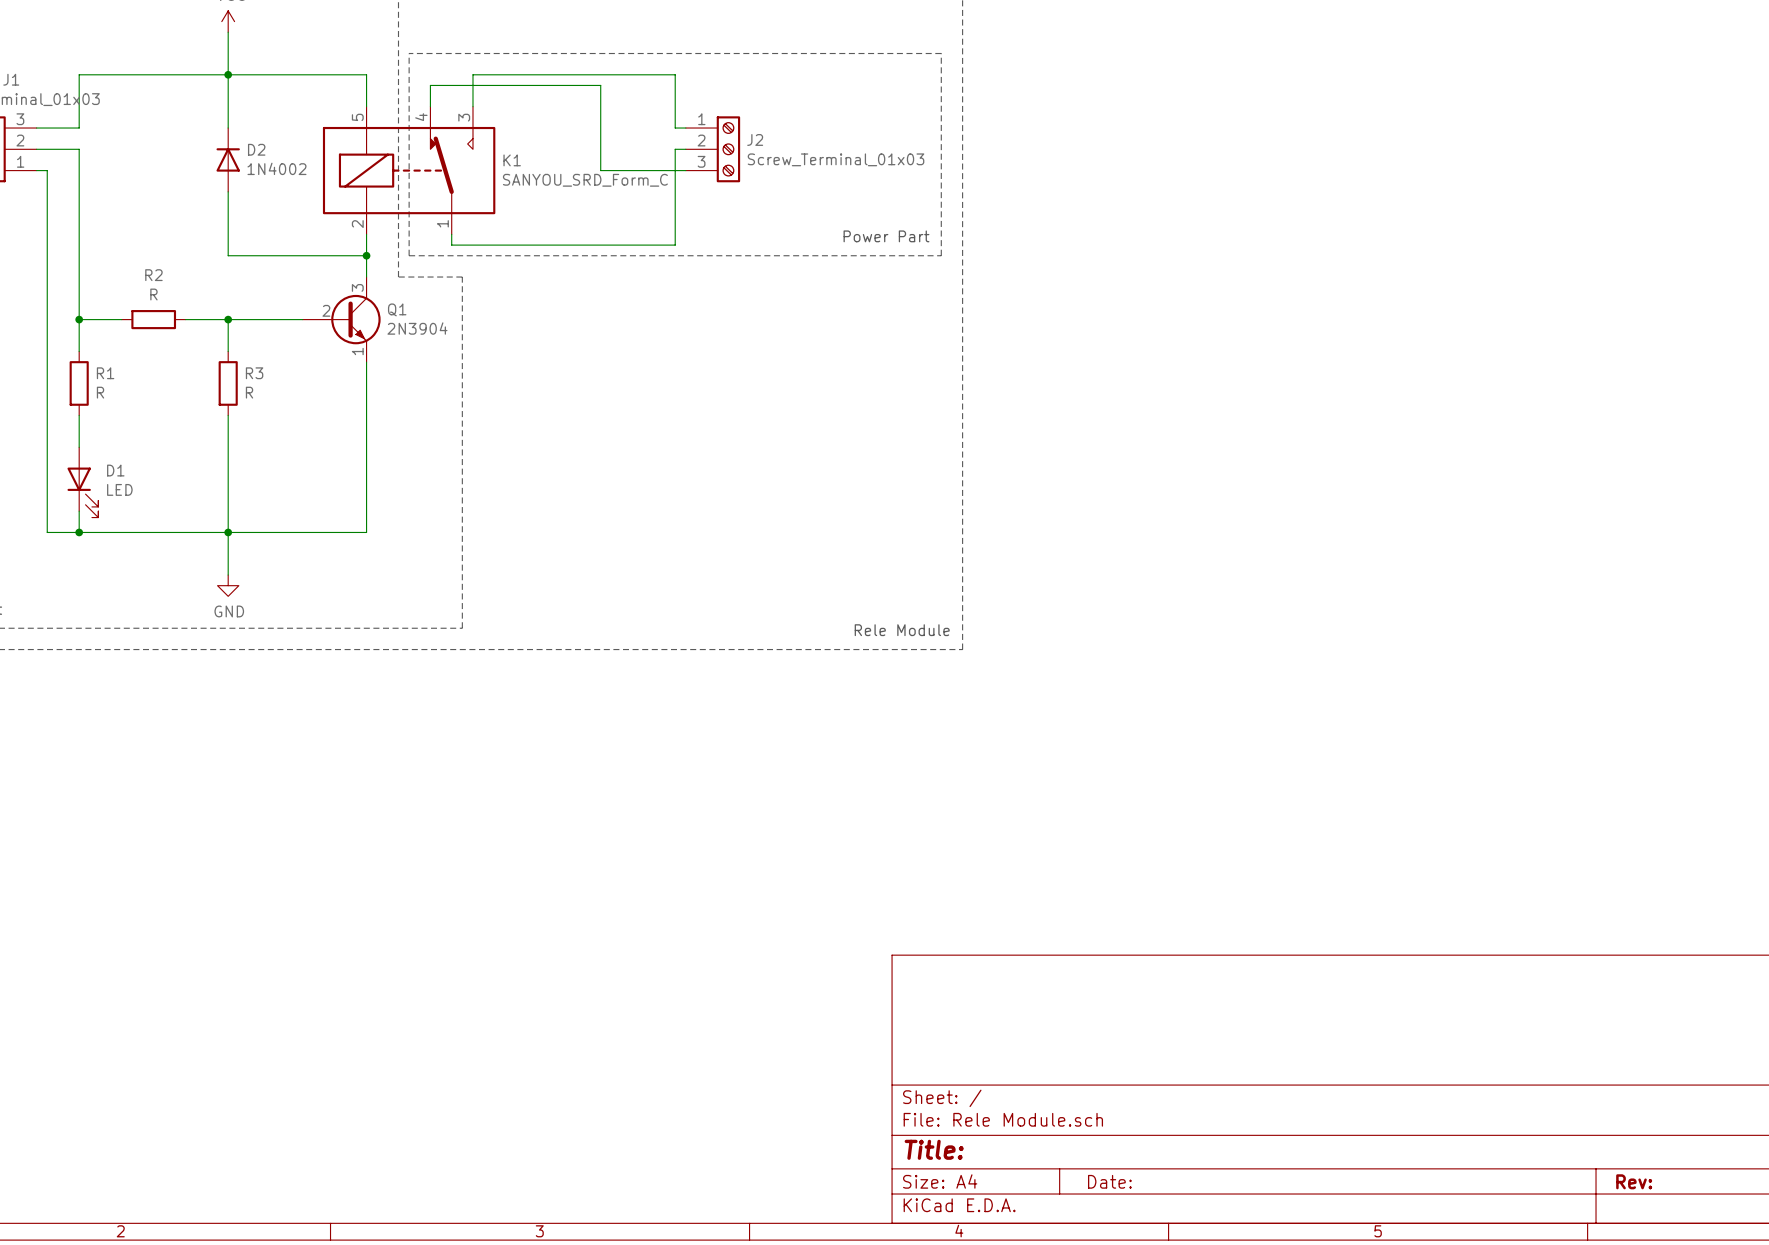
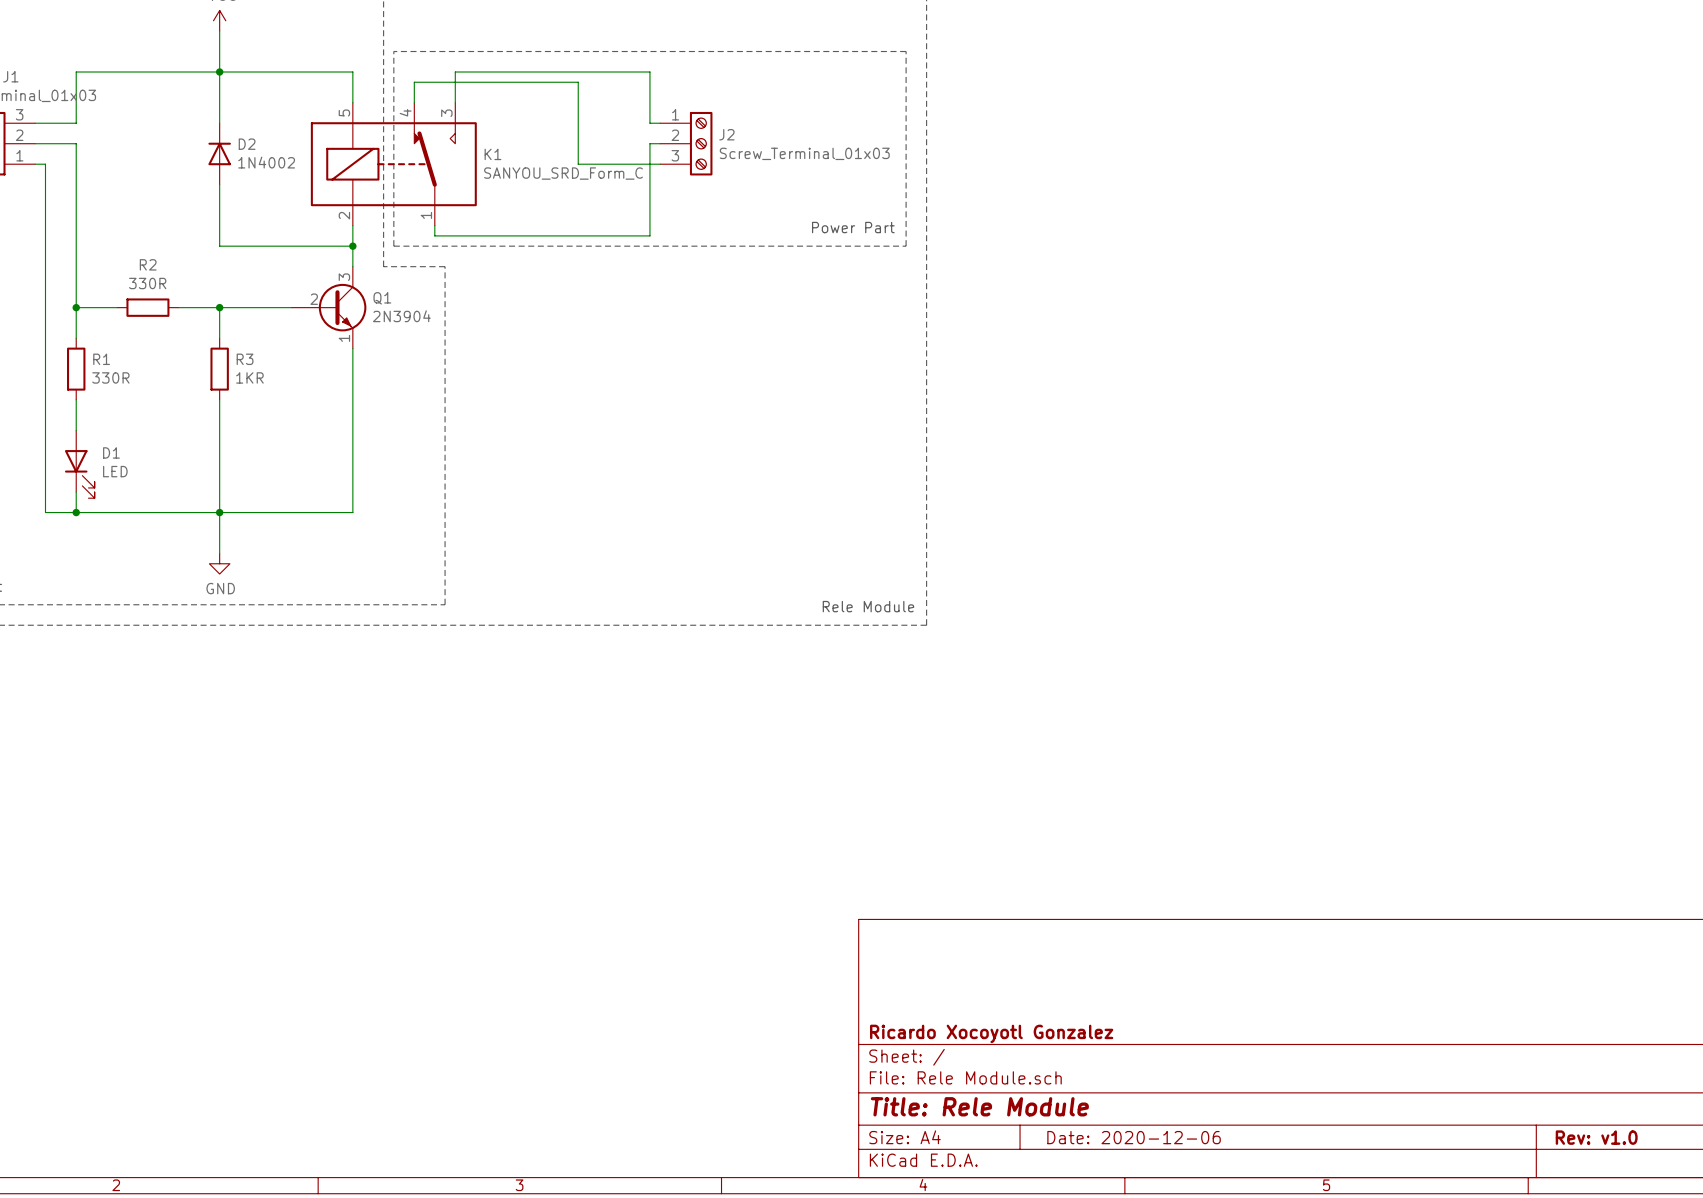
R2 value: R (153, 294) -> 330R (147, 283)
R1 value: R (100, 392) -> 330R (110, 377)
R3 value: R (249, 392) -> 1KR (249, 377)
title block: none -> Ricardo Xocoyotl Gonzalez (991, 1033)
title block: Title: (934, 1149) -> Title: Rele Module (979, 1106)
title block: Date: (1109, 1181) -> Date: 2020-12-06 (1134, 1137)
title block: Rev: (1634, 1181) -> Rev: v1.0 (1596, 1137)

